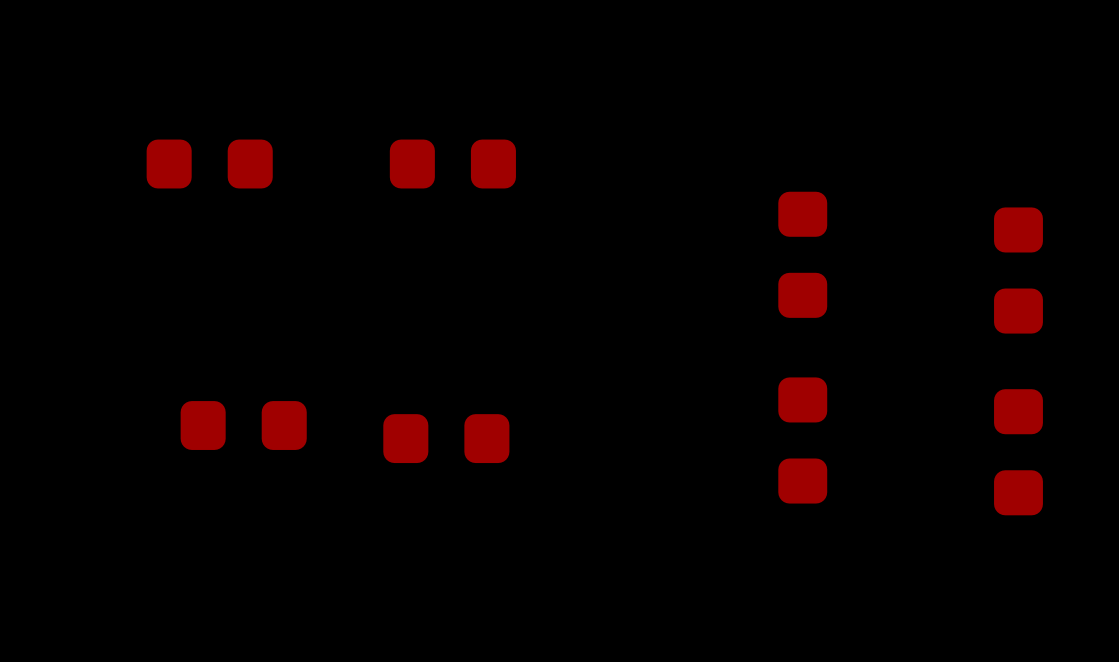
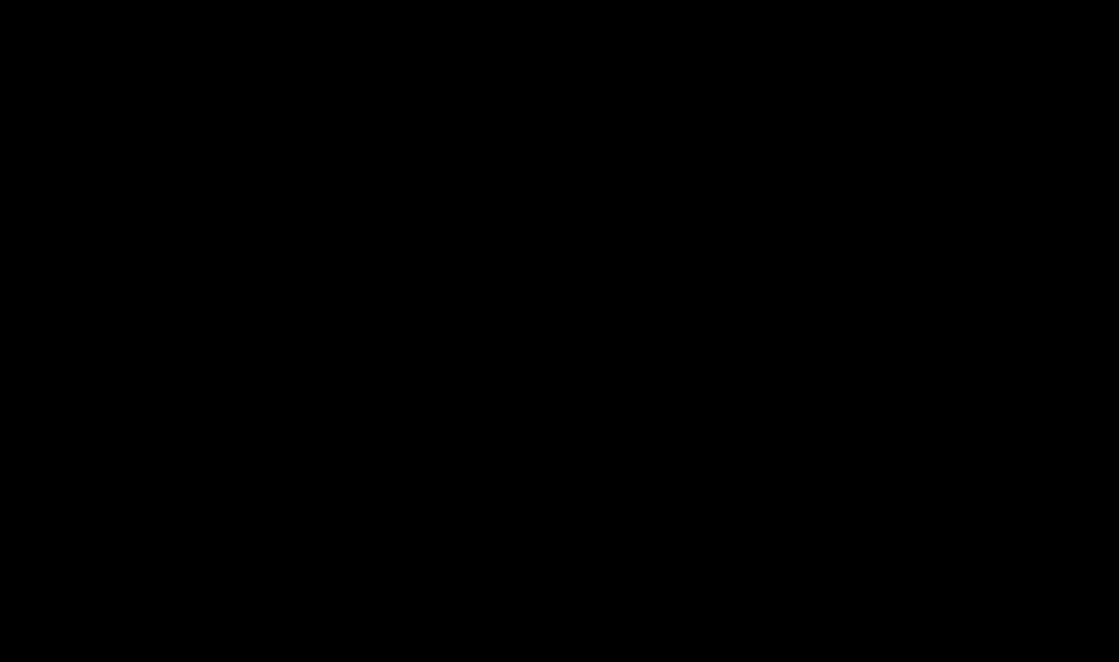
part: (209, 164) -> none
part: (452, 164) -> none
part: (802, 254) -> none
part: (1018, 270) -> none
part: (243, 425) -> none
part: (446, 438) -> none
part: (802, 440) -> none
part: (1018, 452) -> none

